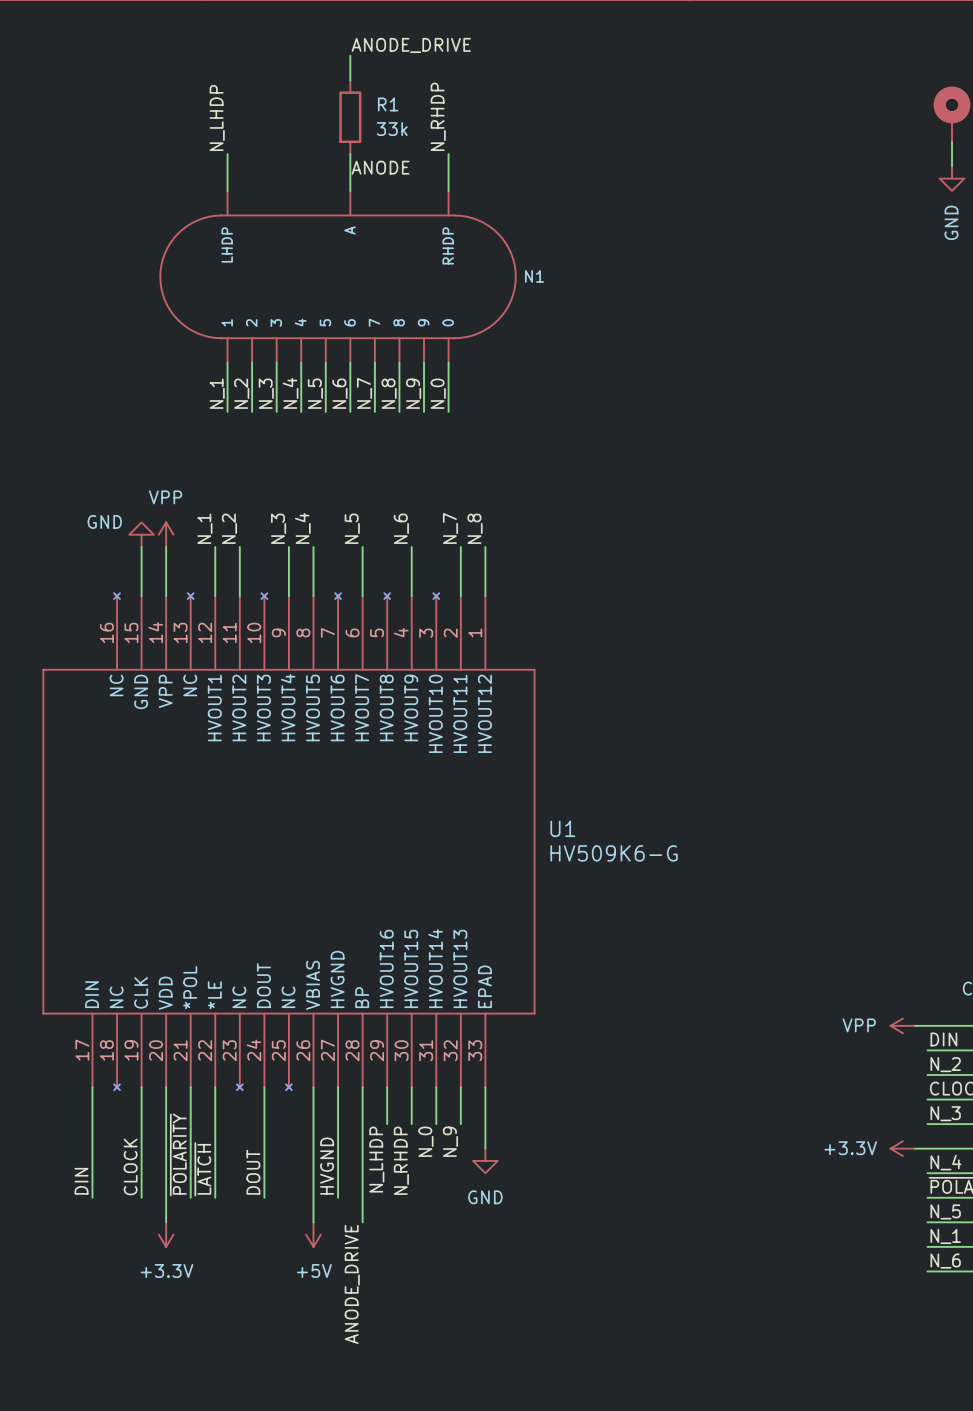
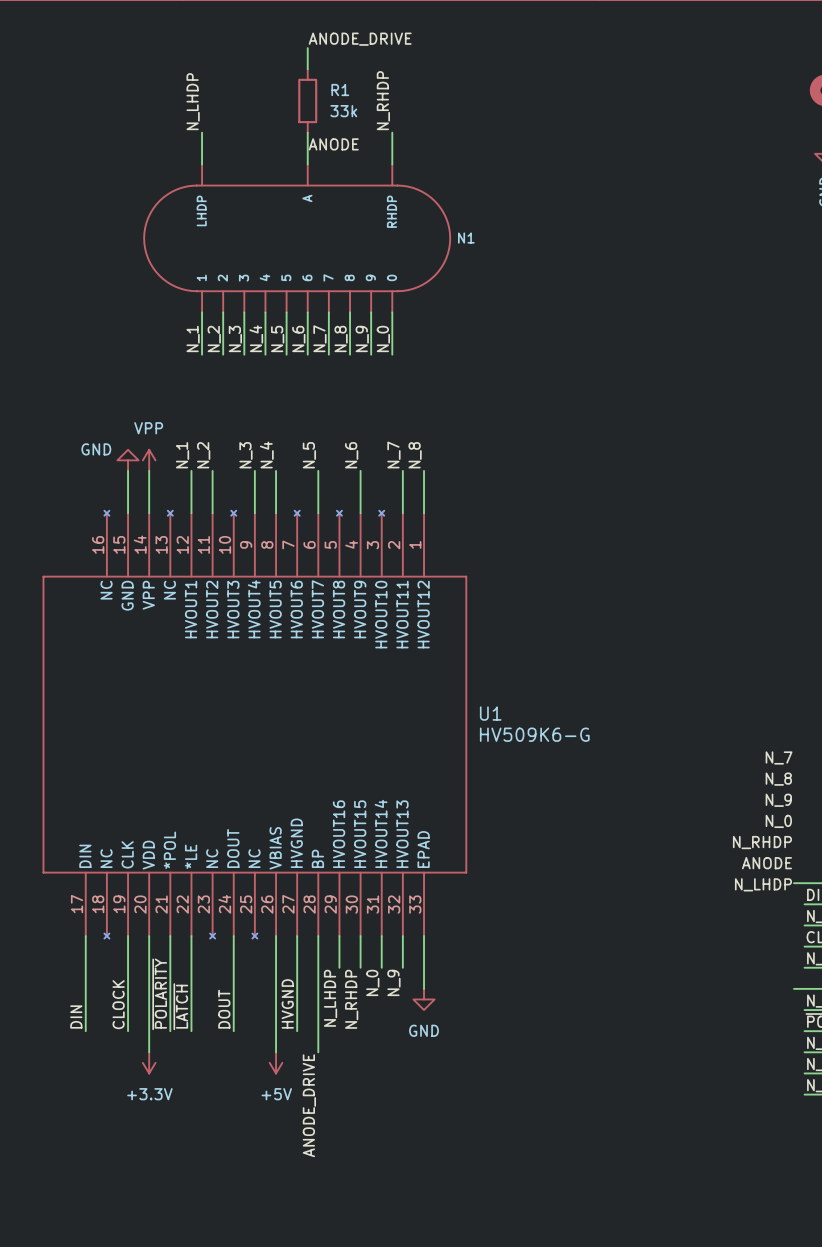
label: none -> N_7 (779, 757)
label: none -> N_8 (778, 779)
label: none -> N_9 (778, 800)
label: none -> N_0 (778, 821)
label: none -> N_RHDP (762, 842)
label: none -> ANODE (766, 863)
power symbol: VPP (902, 1025) -> none
label: none -> N_LHDP (763, 884)
power symbol: +3.3V (902, 1148) -> none

